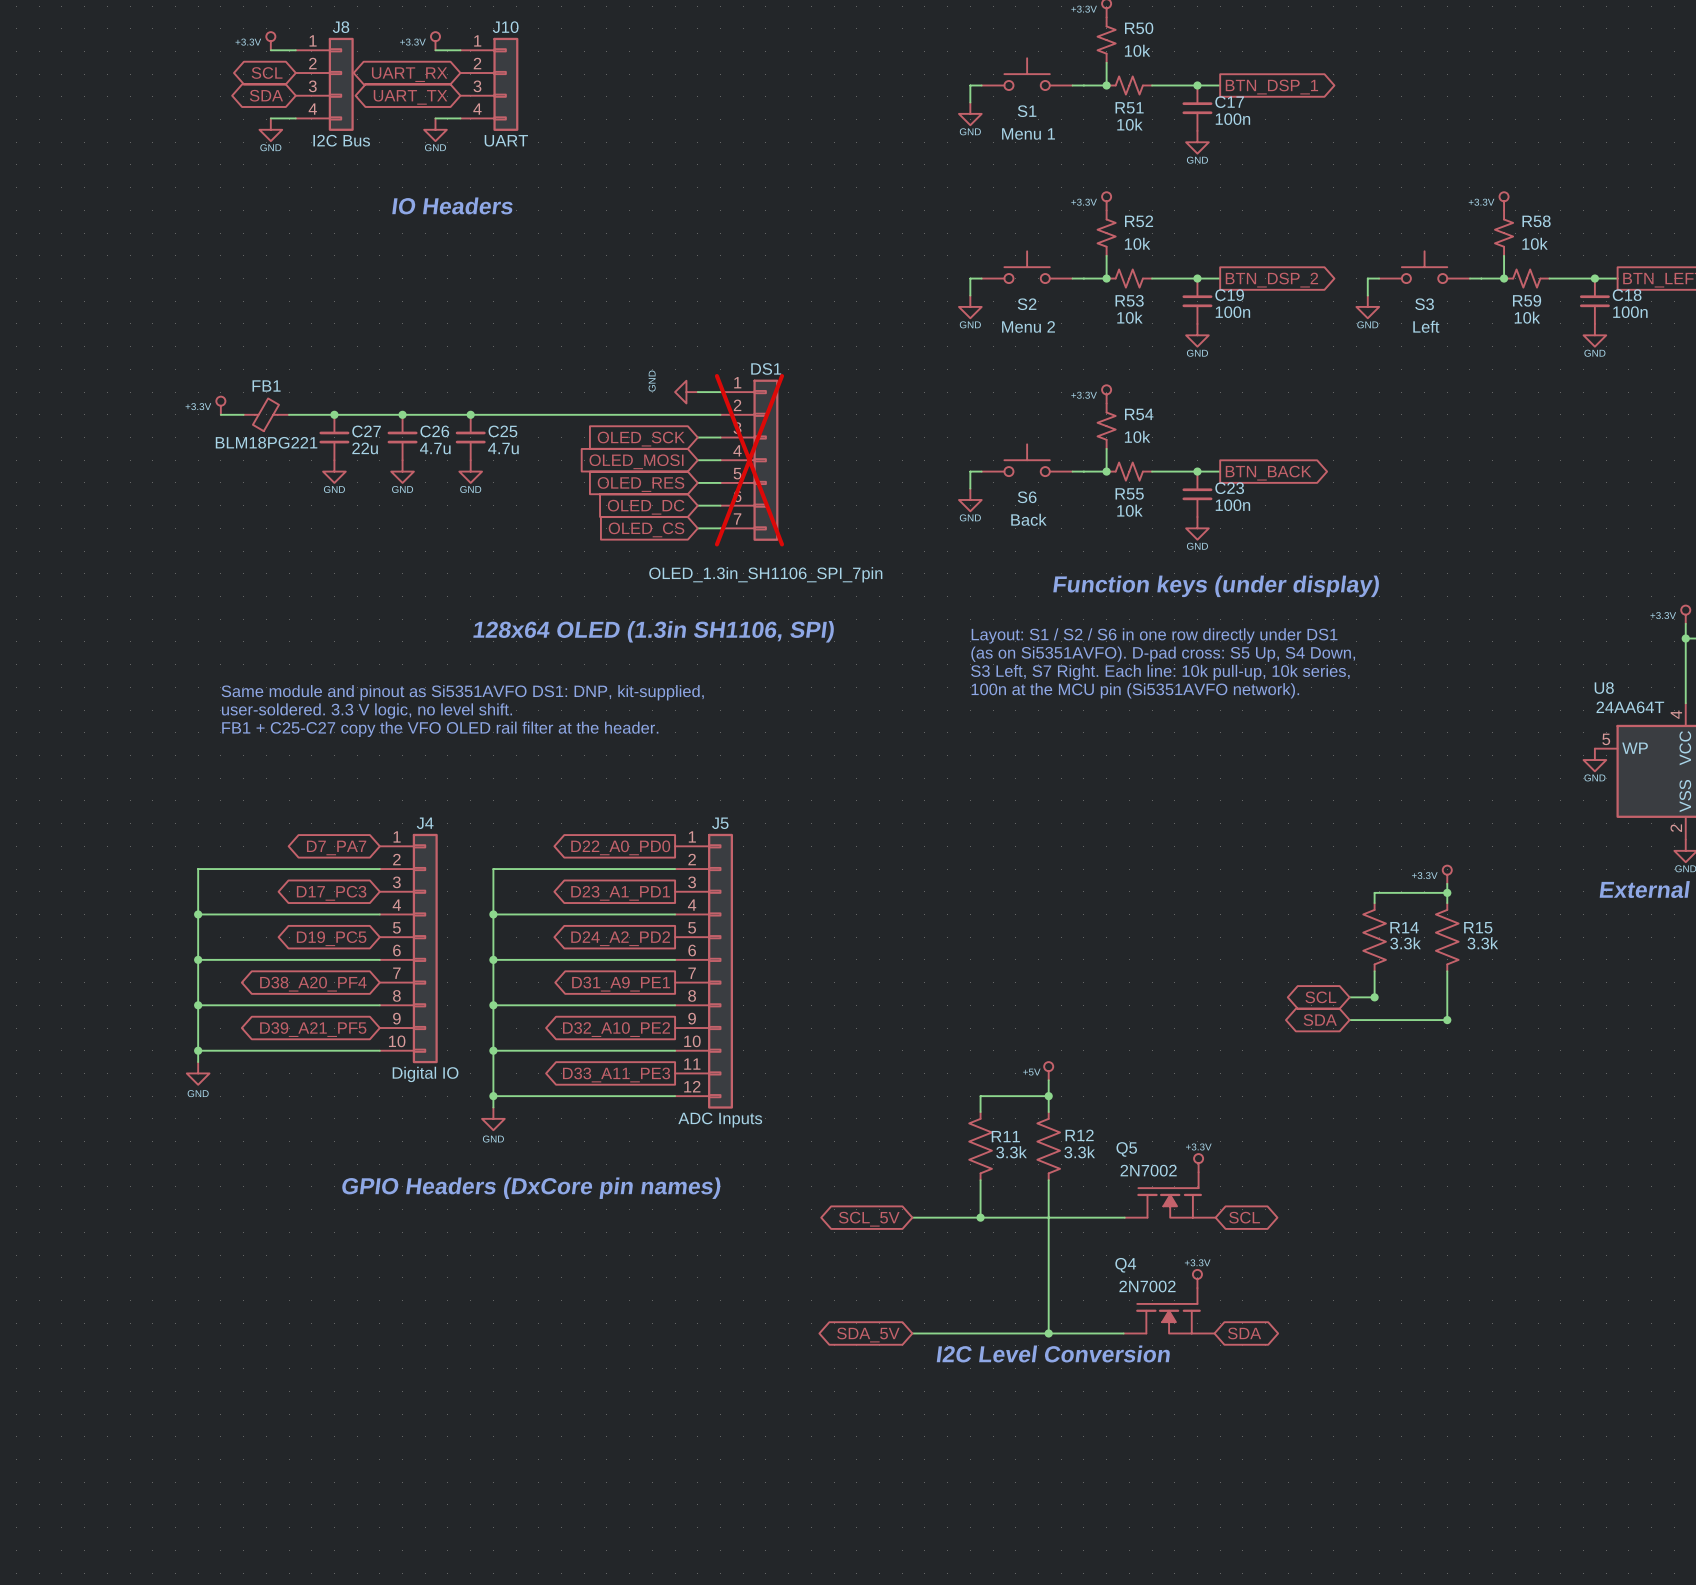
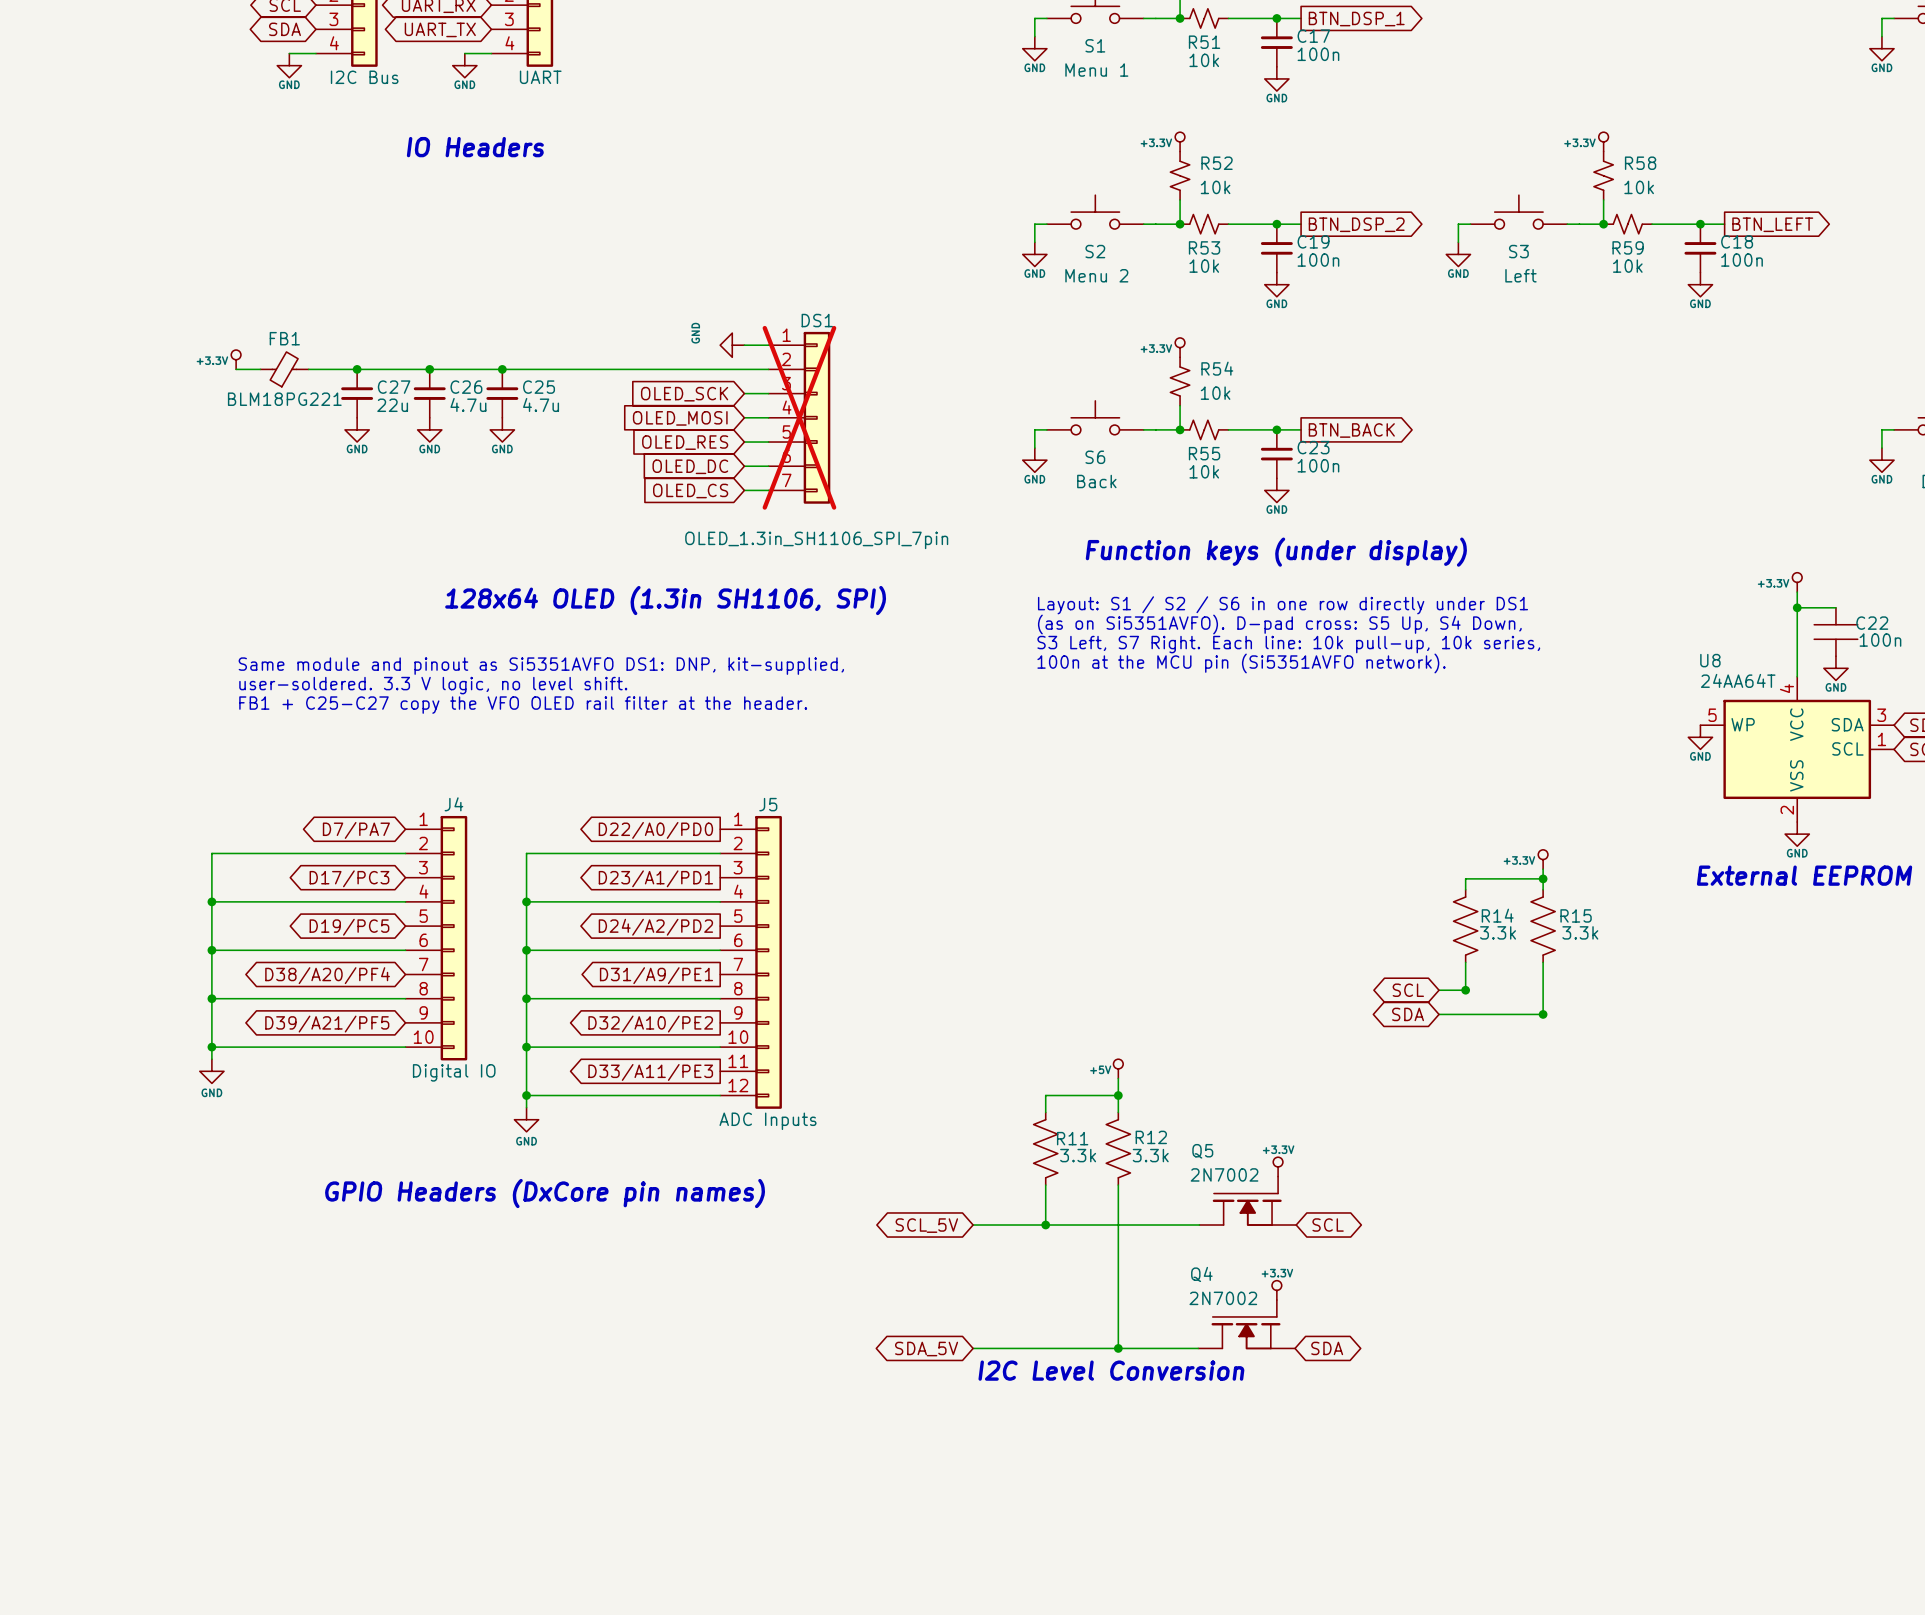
global label: D7_PA7 (336, 847) -> D7/PA7 (356, 830)
global label: D22_A0_PD0 (620, 847) -> D22/A0/PD0 (655, 830)
global label: D17_PC3 (331, 893) -> D17/PC3 (349, 878)
global label: D23_A1_PD1 (620, 893) -> D23/A1/PD1 (655, 878)
global label: D19_PC5 (331, 938) -> D19/PC5 (349, 927)
global label: D24_A2_PD2 (620, 938) -> D24/A2/PD2 (655, 927)
global label: D38_A20_PF4 (313, 984) -> D38/A20/PF4 (327, 975)
global label: D31_A9_PE1 (621, 984) -> D31/A9/PE1 (656, 975)
global label: D39_A21_PF5 (313, 1029) -> D39/A21/PF5 (327, 1024)
global label: D32_A10_PE2 (616, 1029) -> D32/A10/PE2 (650, 1024)
global label: D33_A11_PE3 (616, 1074) -> D33/A11/PE3 (650, 1072)

